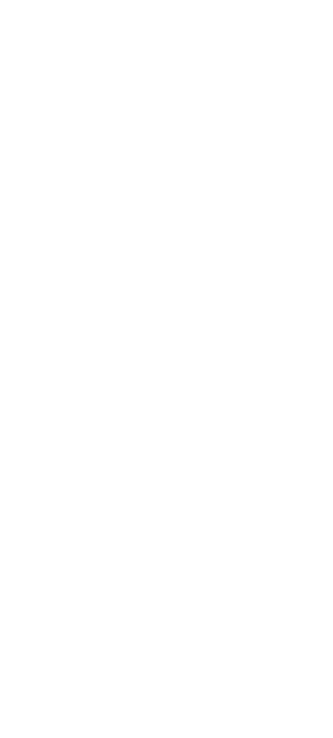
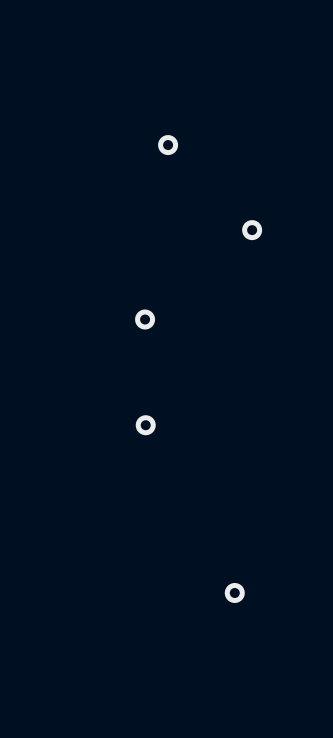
via: none -> (168, 145)
via: none -> (252, 230)
via: none -> (145, 319)
via: none -> (145, 425)
via: none -> (234, 592)

